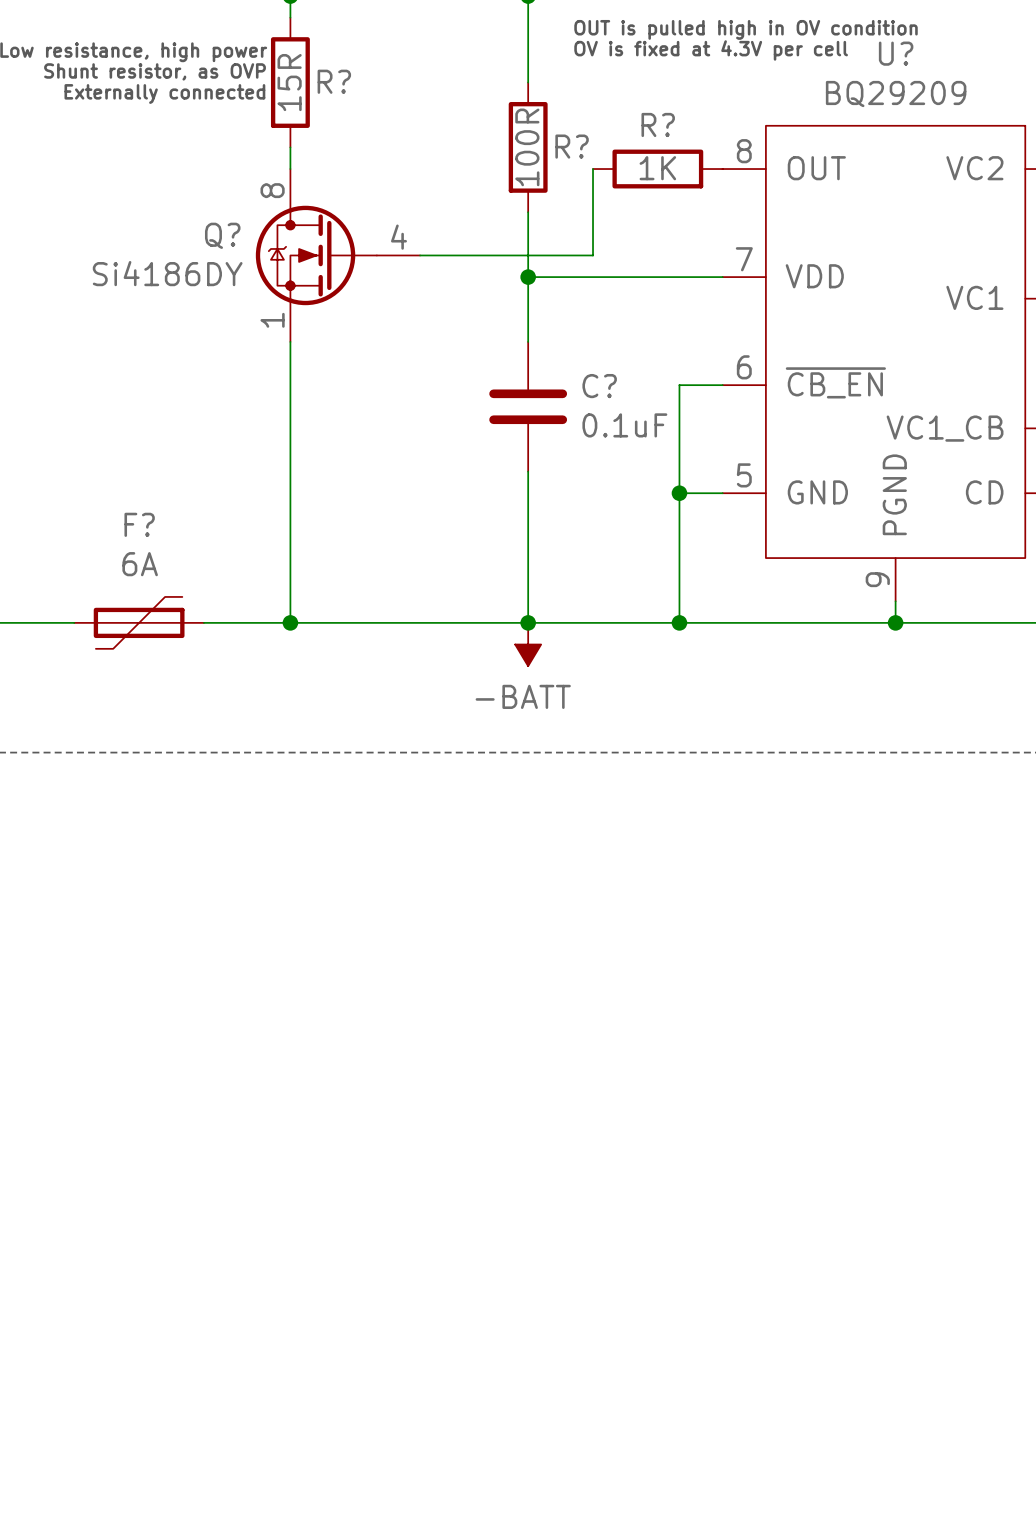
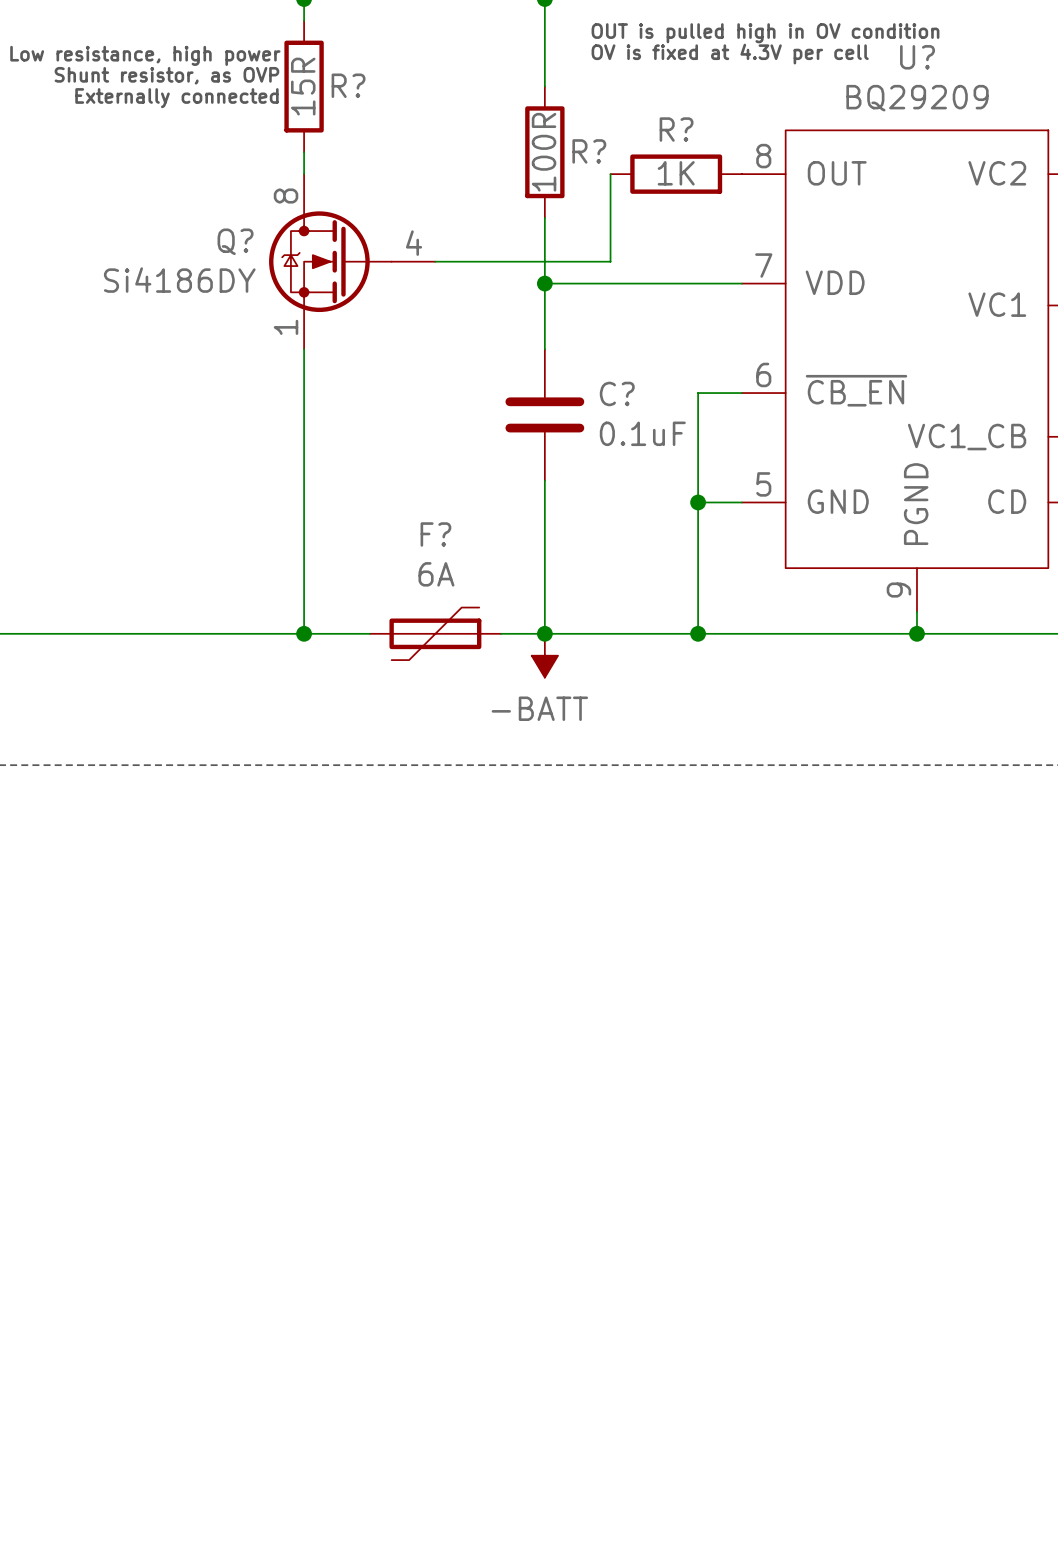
F? position: (139, 622) -> (435, 633)

